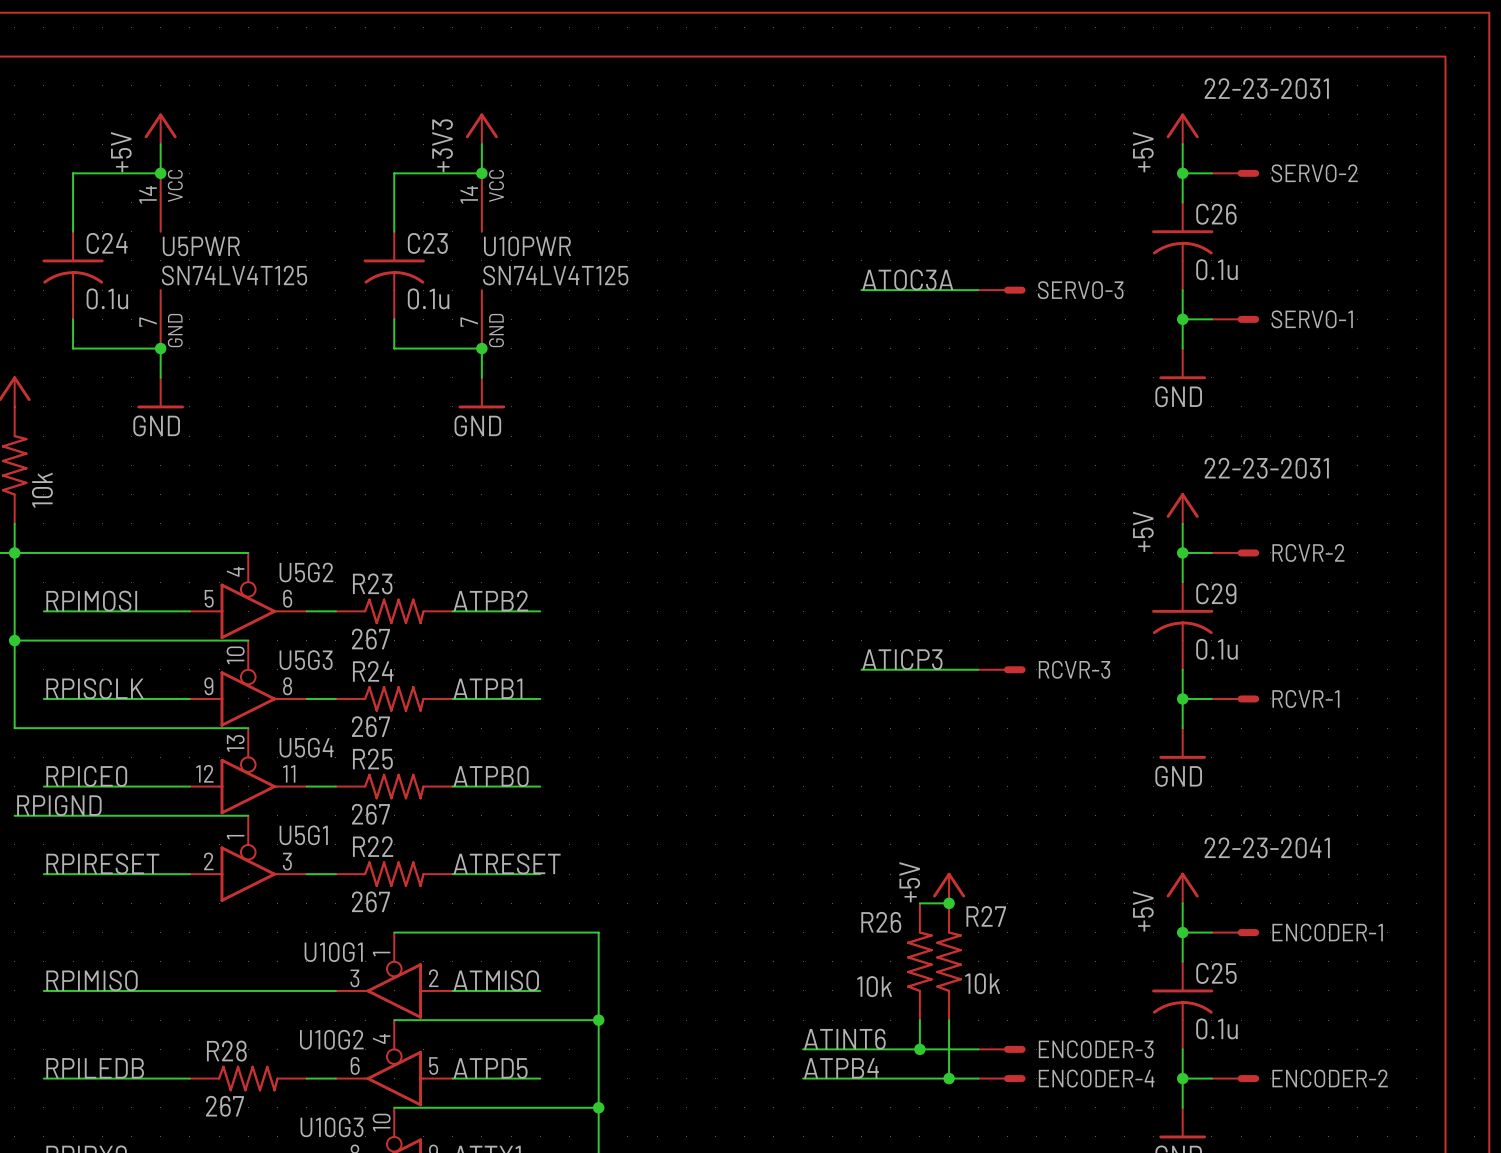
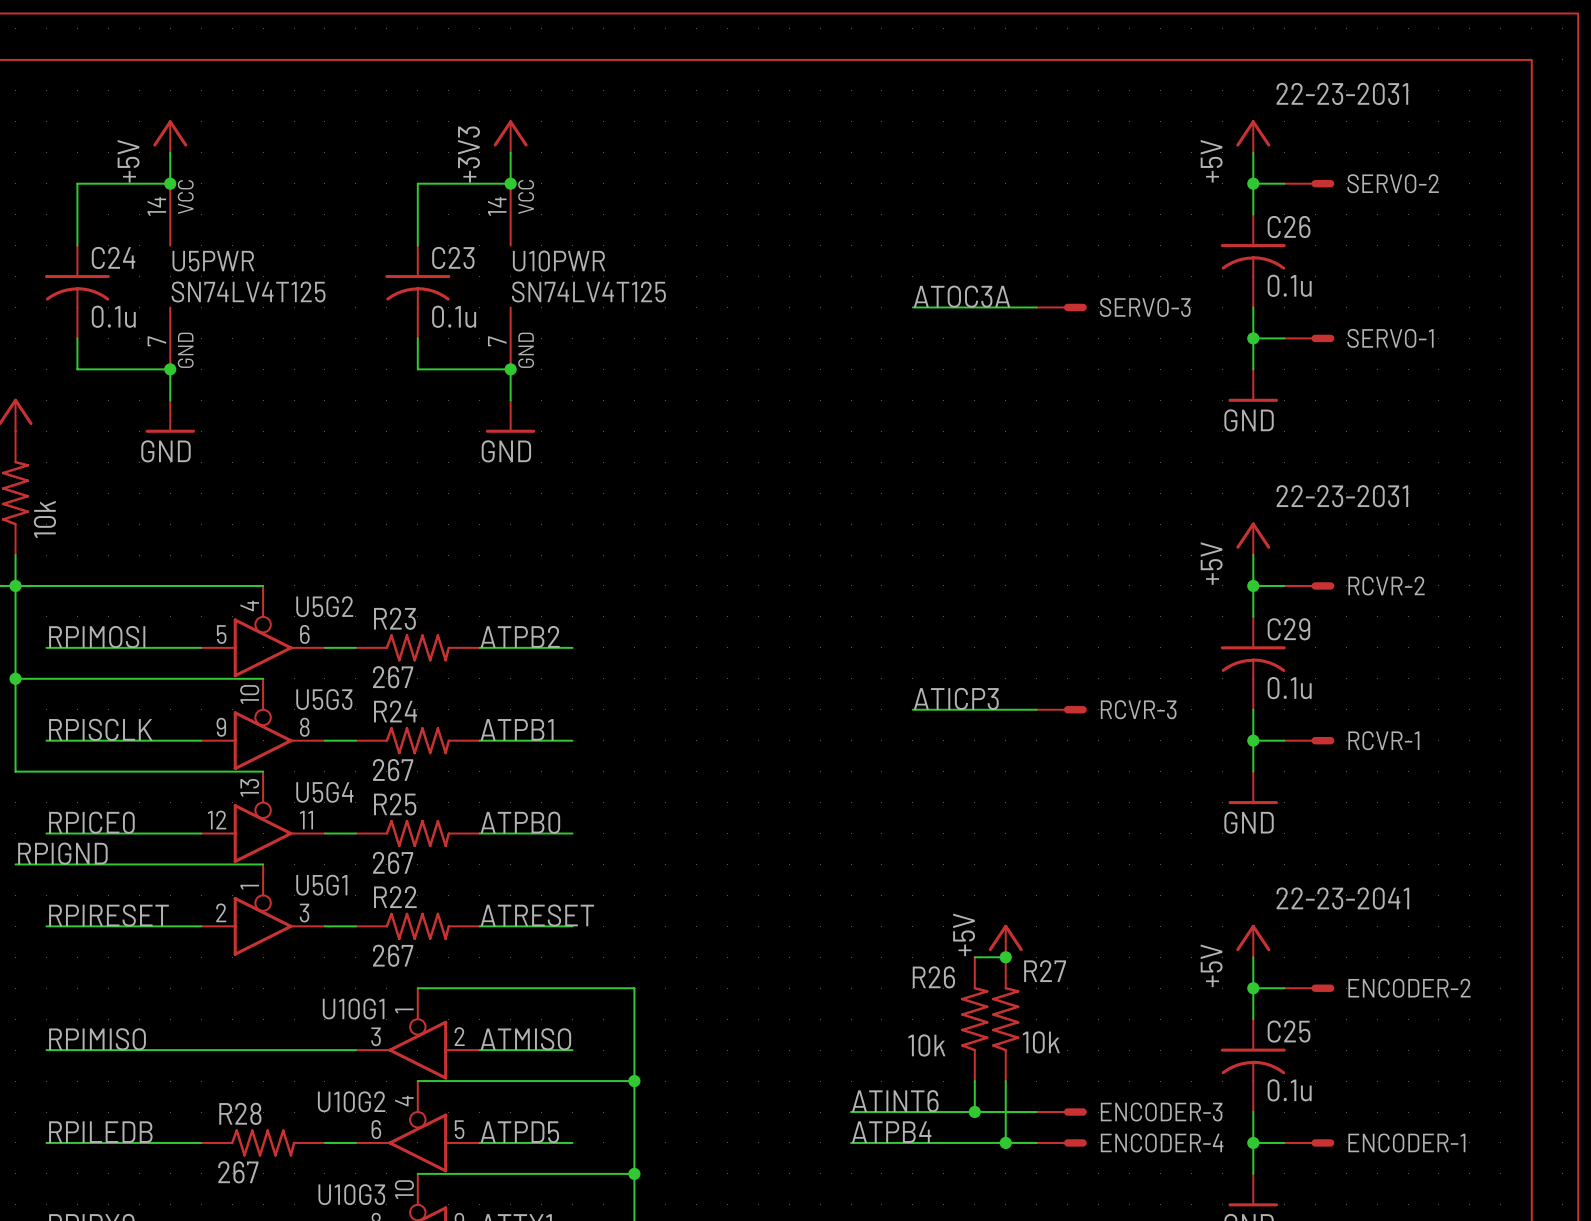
ENCODER-1 name: ENCODER-1 (1327, 932) -> ENCODER-2 (1409, 988)
ENCODER-2 name: ENCODER-2 (1330, 1078) -> ENCODER-1 (1406, 1142)

